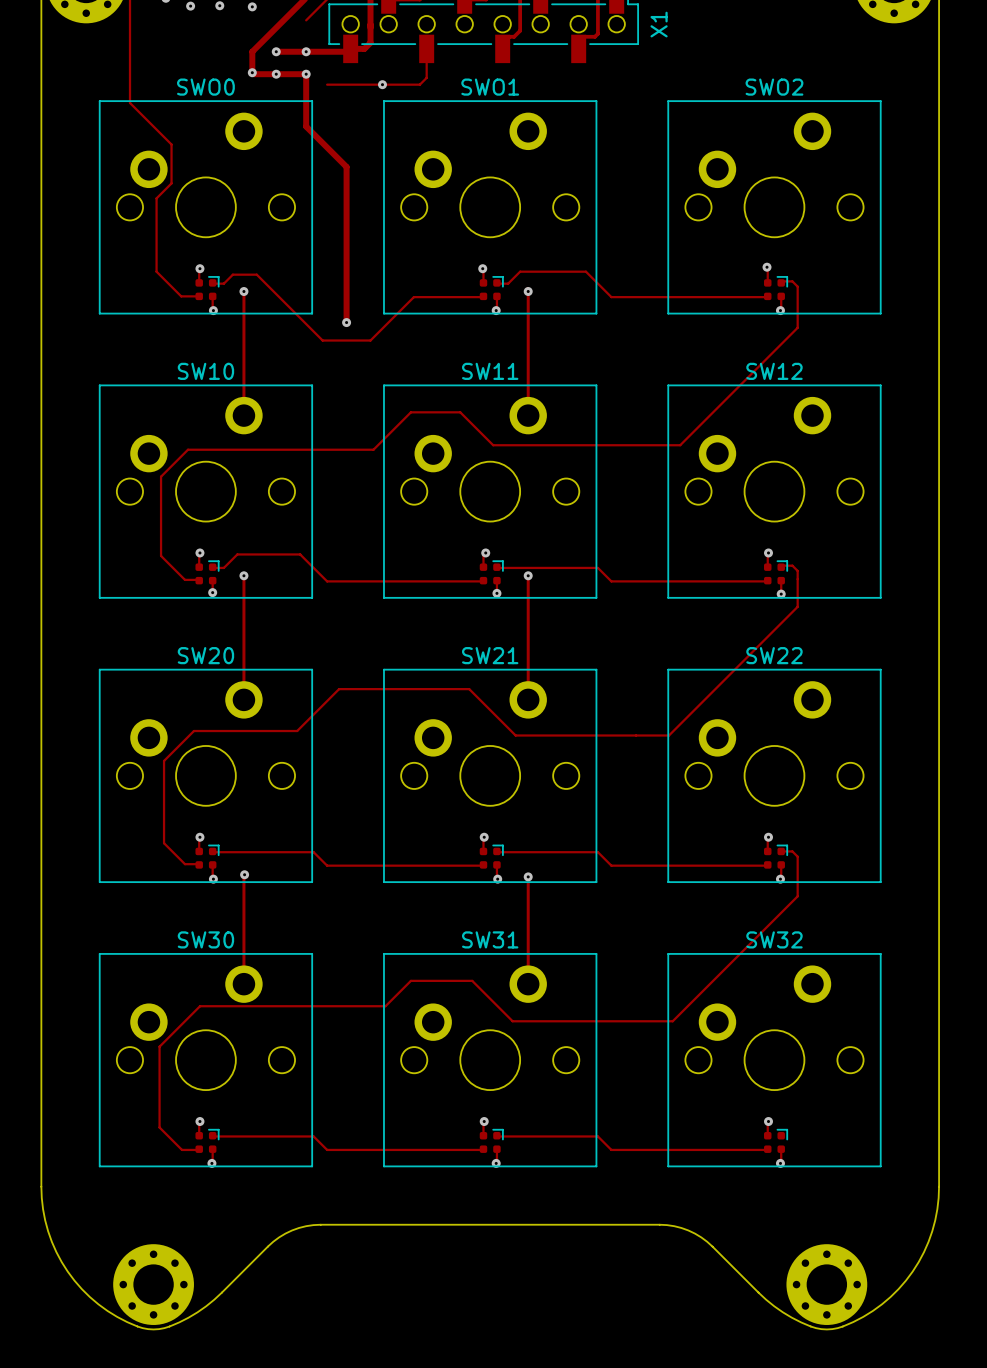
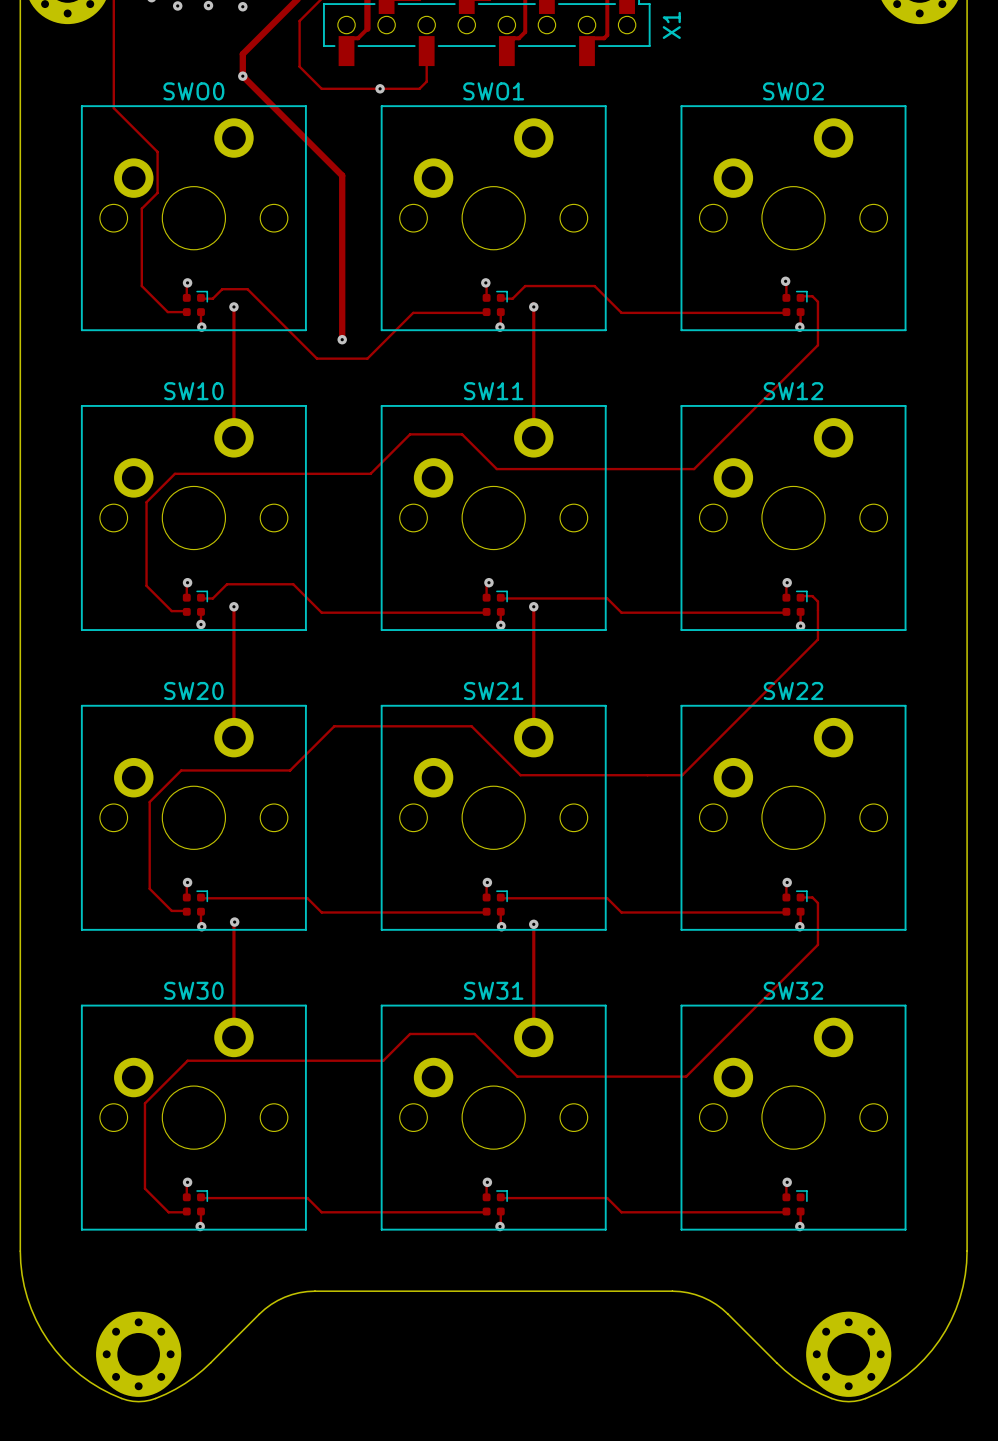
track: none -> (299, 20) (299, 66) (321, 88)
track: (370, 27) (370, 42) (364, 48) (350, 48) (347, 51) (276, 51) -> (367, 28) (357, 38) (351, 38)
via: (276, 51) -> none
via: (306, 51) -> none
track: (253, 74) (306, 74) (306, 126) -> (244, 77) (299, 132)
via: (276, 74) -> none
via: (306, 74) -> none

